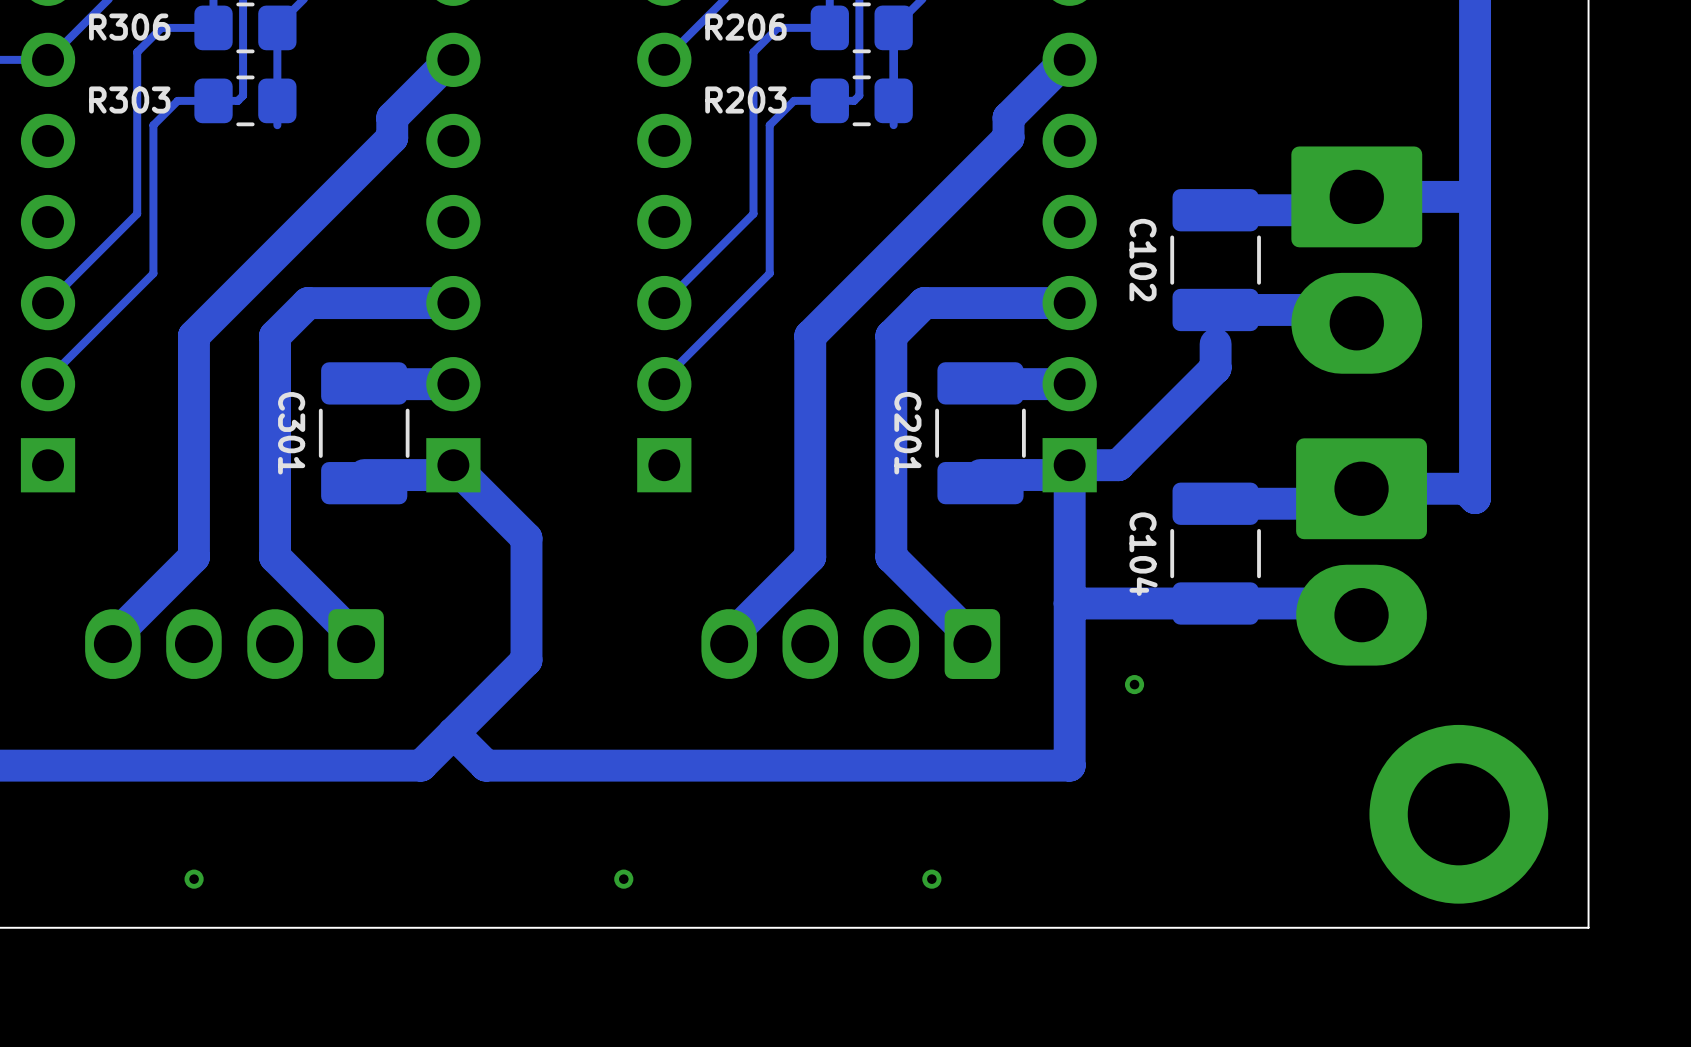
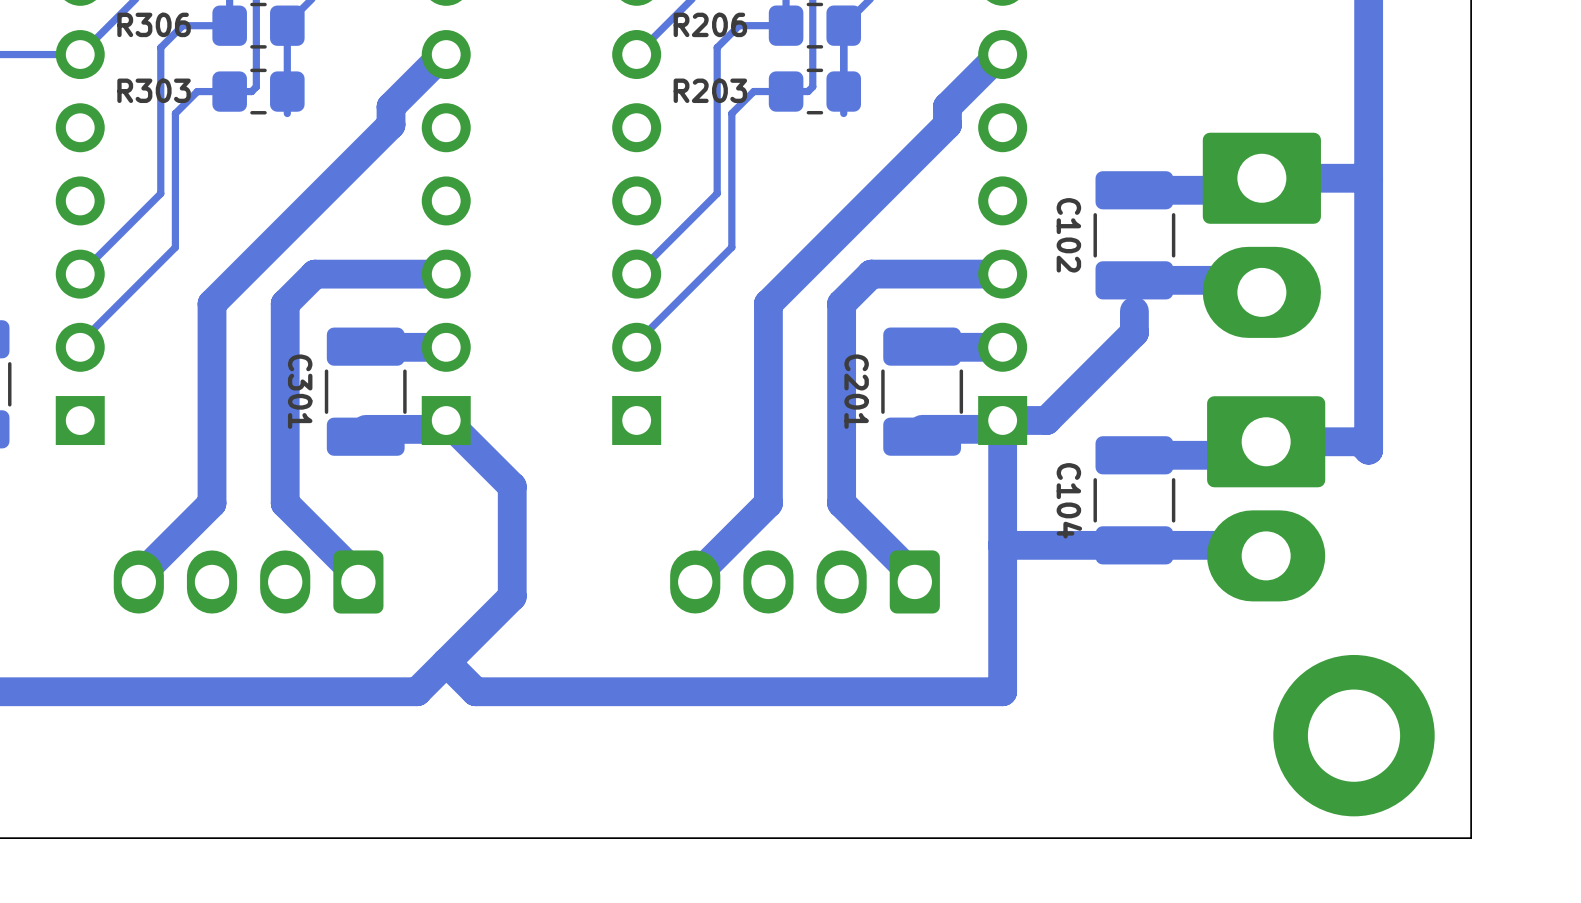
via: (1134, 684) -> none
via: (194, 879) -> none
via: (623, 879) -> none
via: (931, 879) -> none

